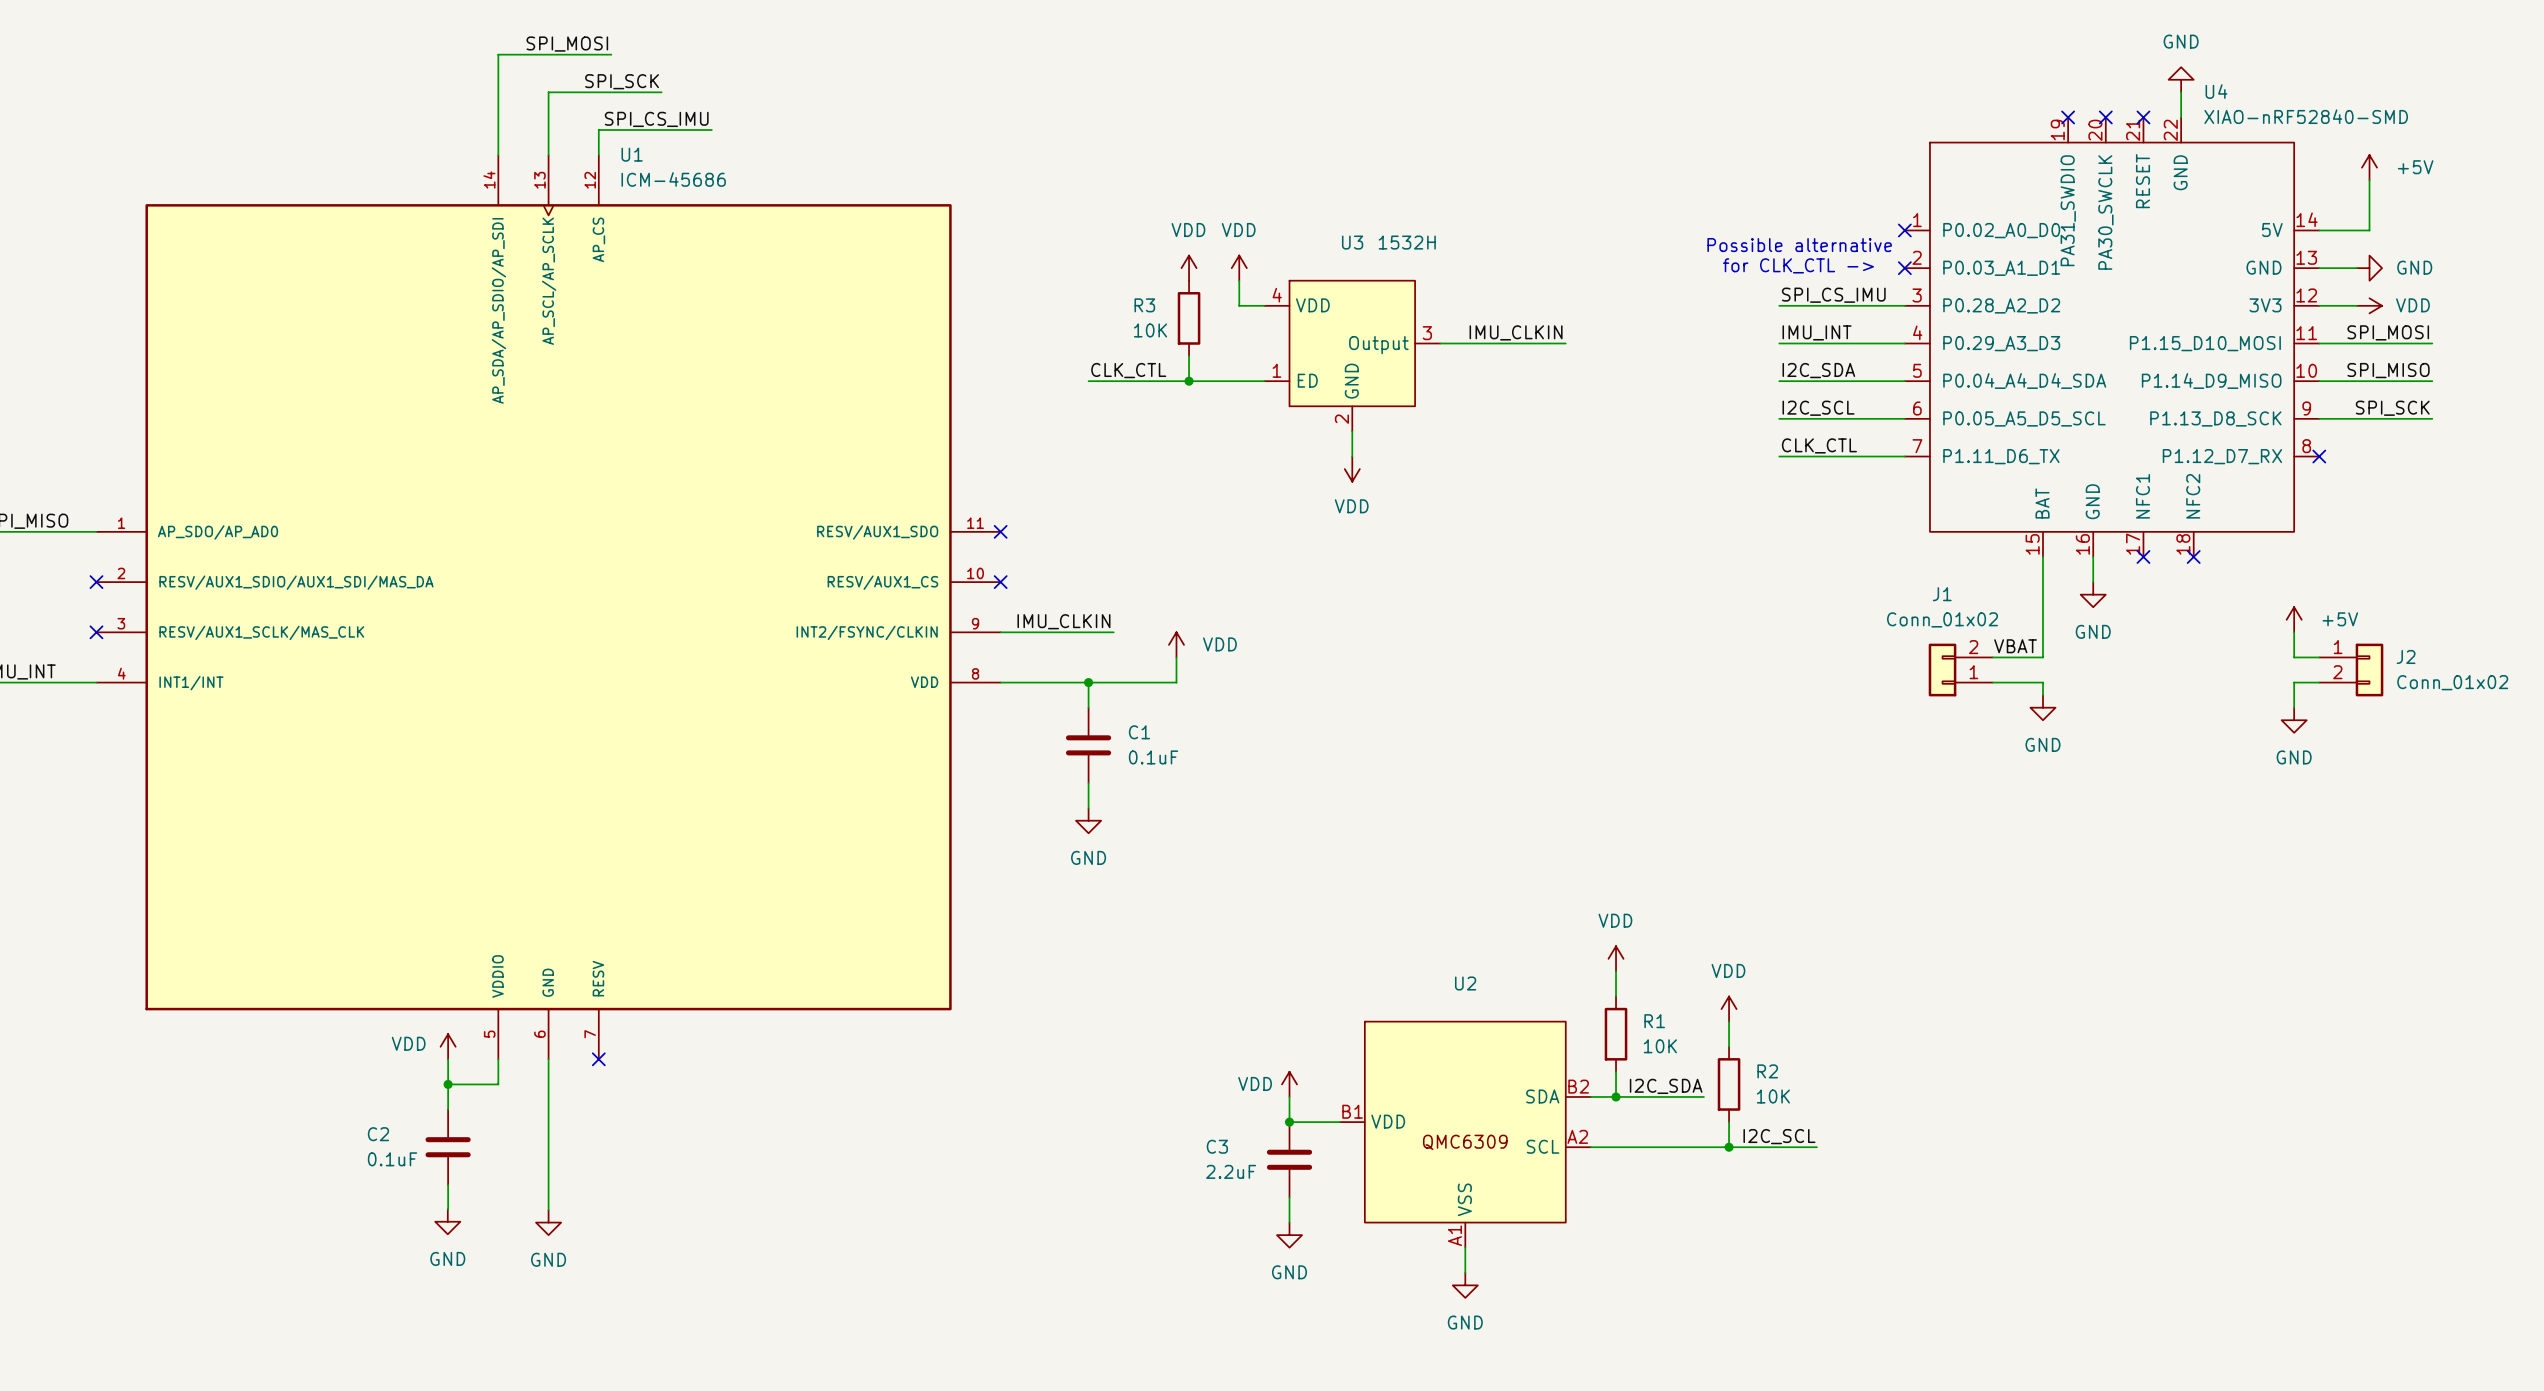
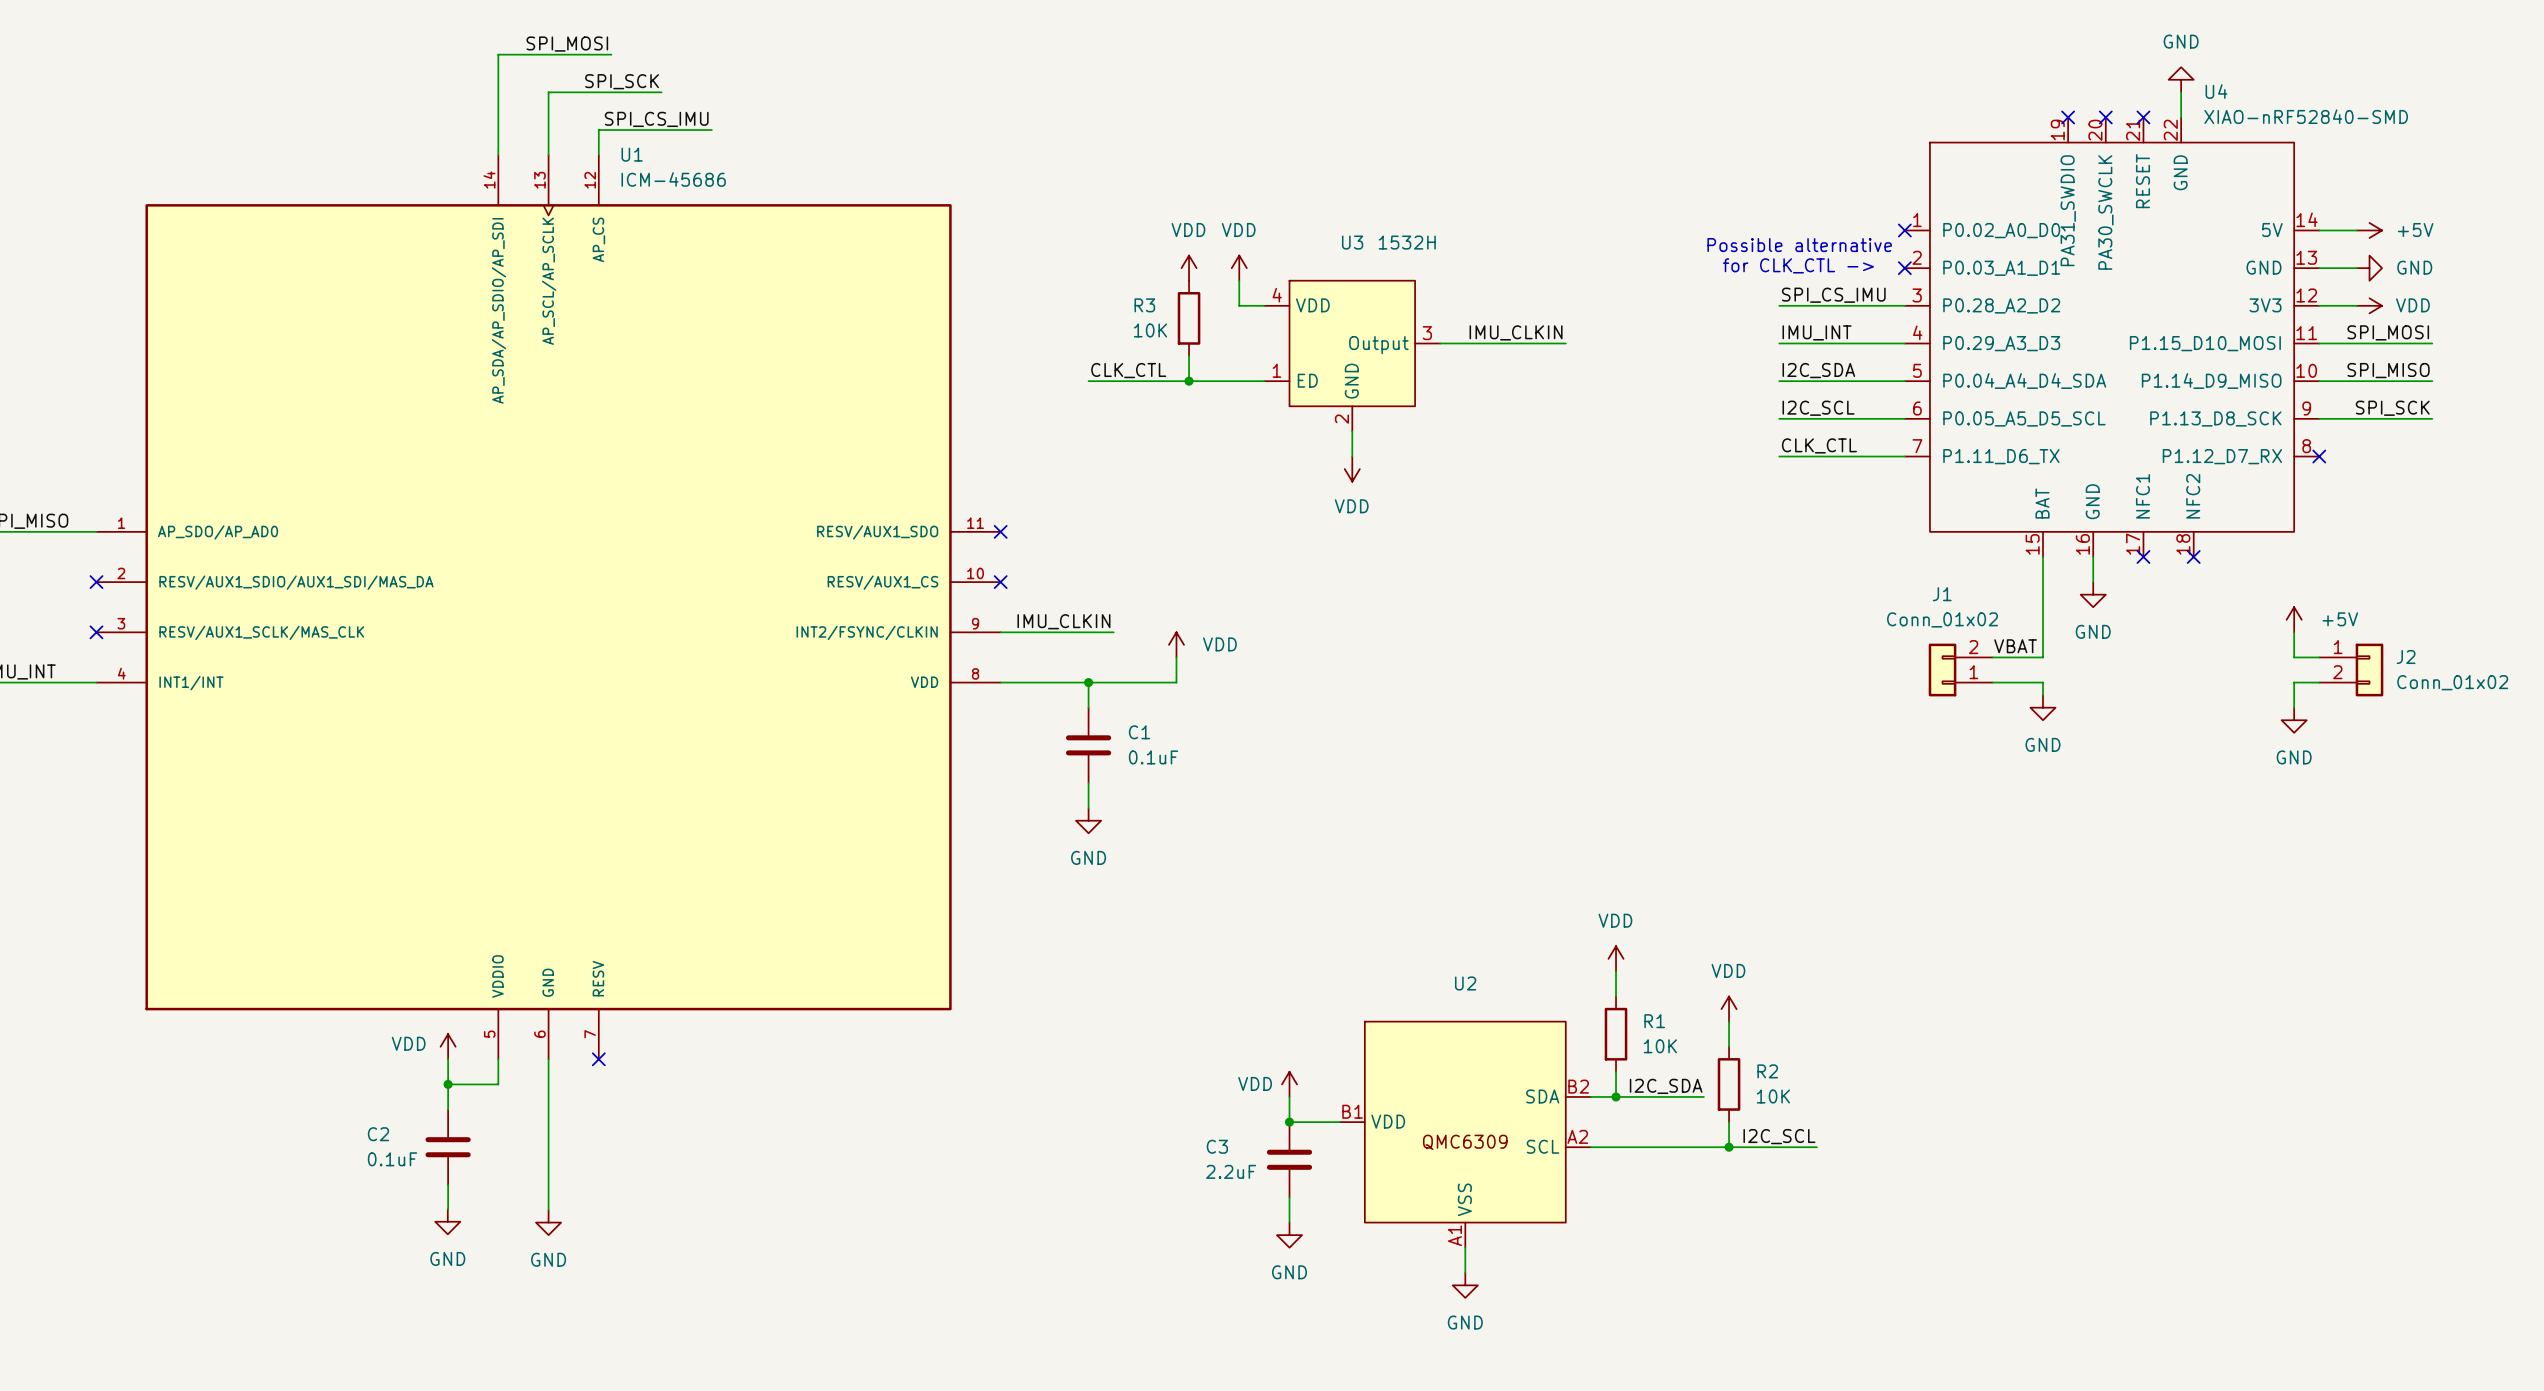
power symbol rotation: 0° (2369, 167) -> 90° clockwise (2369, 230)
power symbol position: +5V (2369, 167) -> +5V (2369, 230)
wire: (2369, 180) (2369, 230) (2356, 230) -> none

